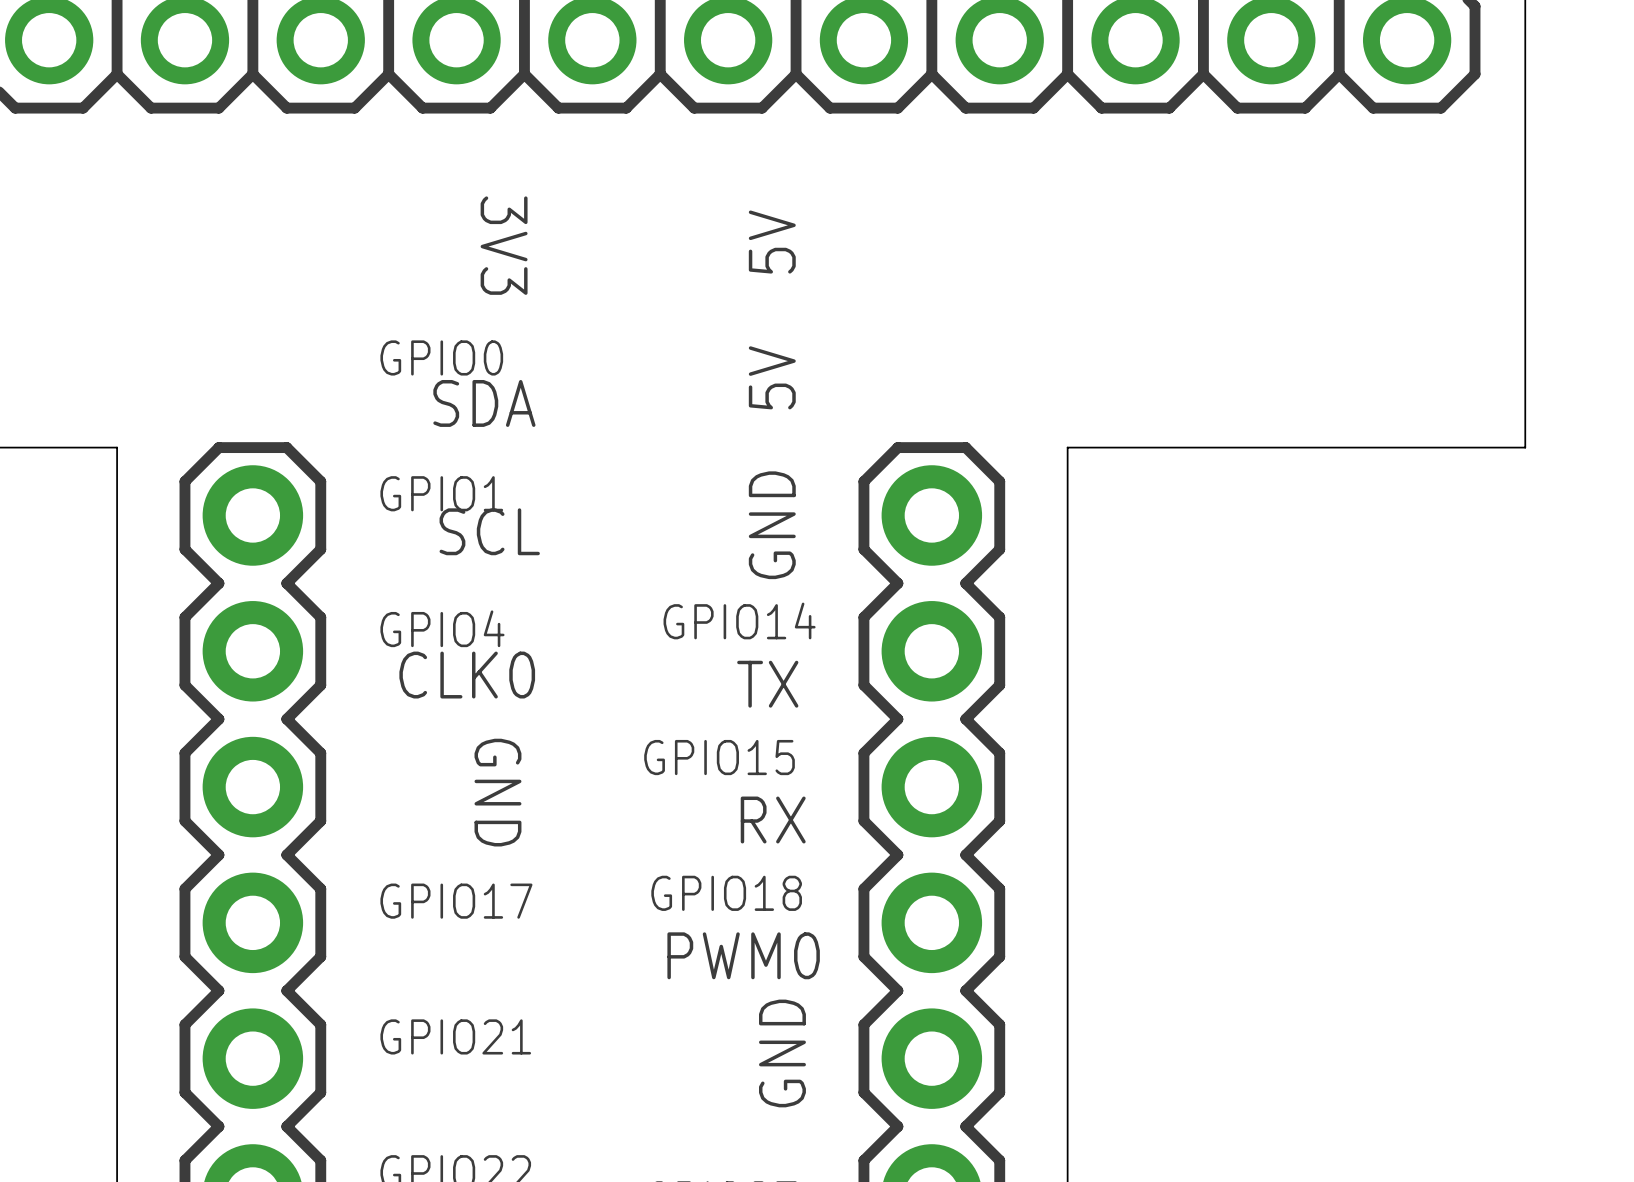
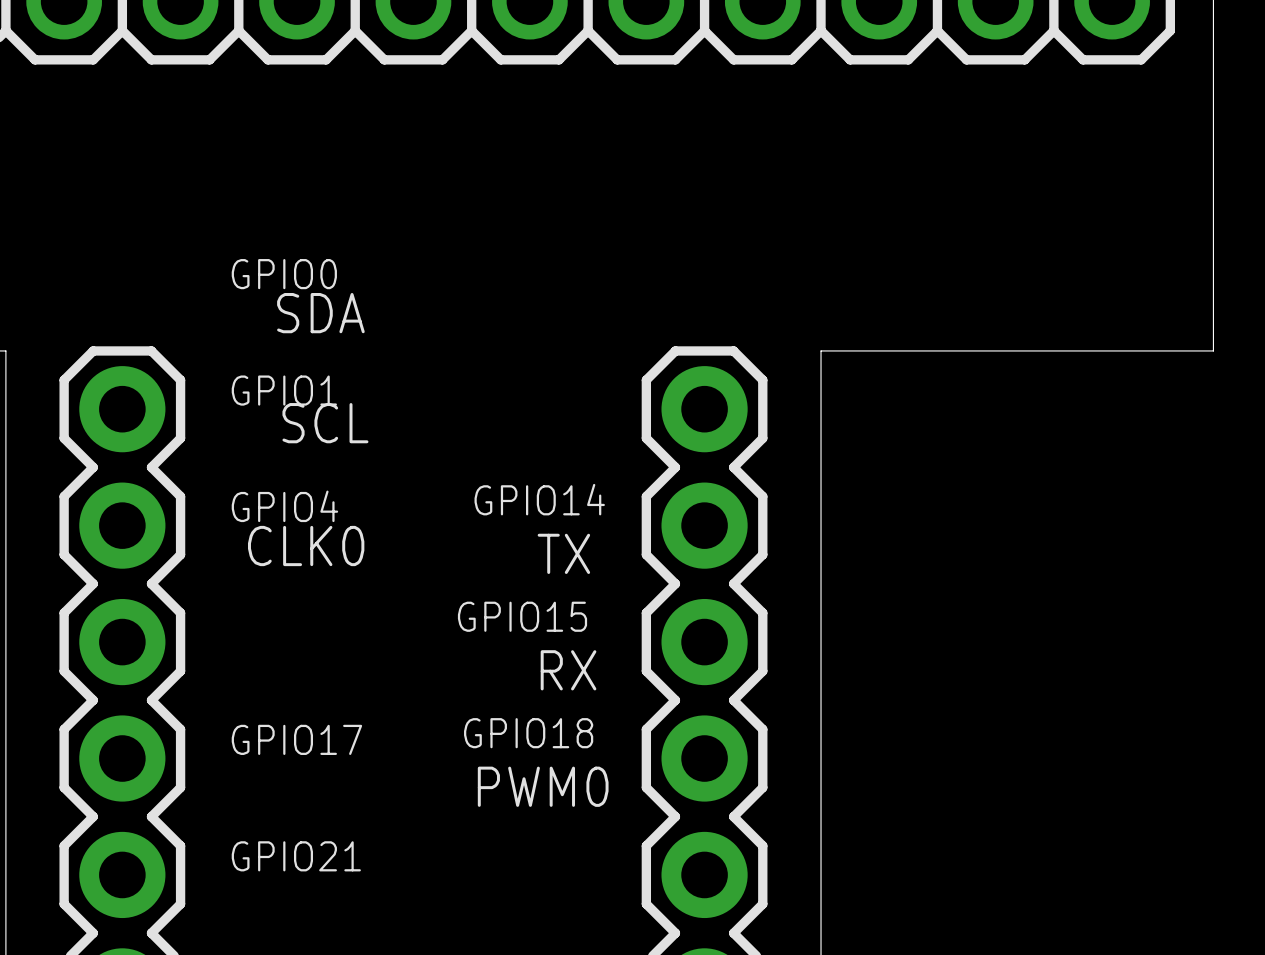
text: 5V (772, 242) -> none
text: 3V3 (504, 245) -> none
text: 5V (772, 377) -> none
text: GND (772, 525) -> none
text: GND (497, 792) -> none
text: GND (782, 1053) -> none

